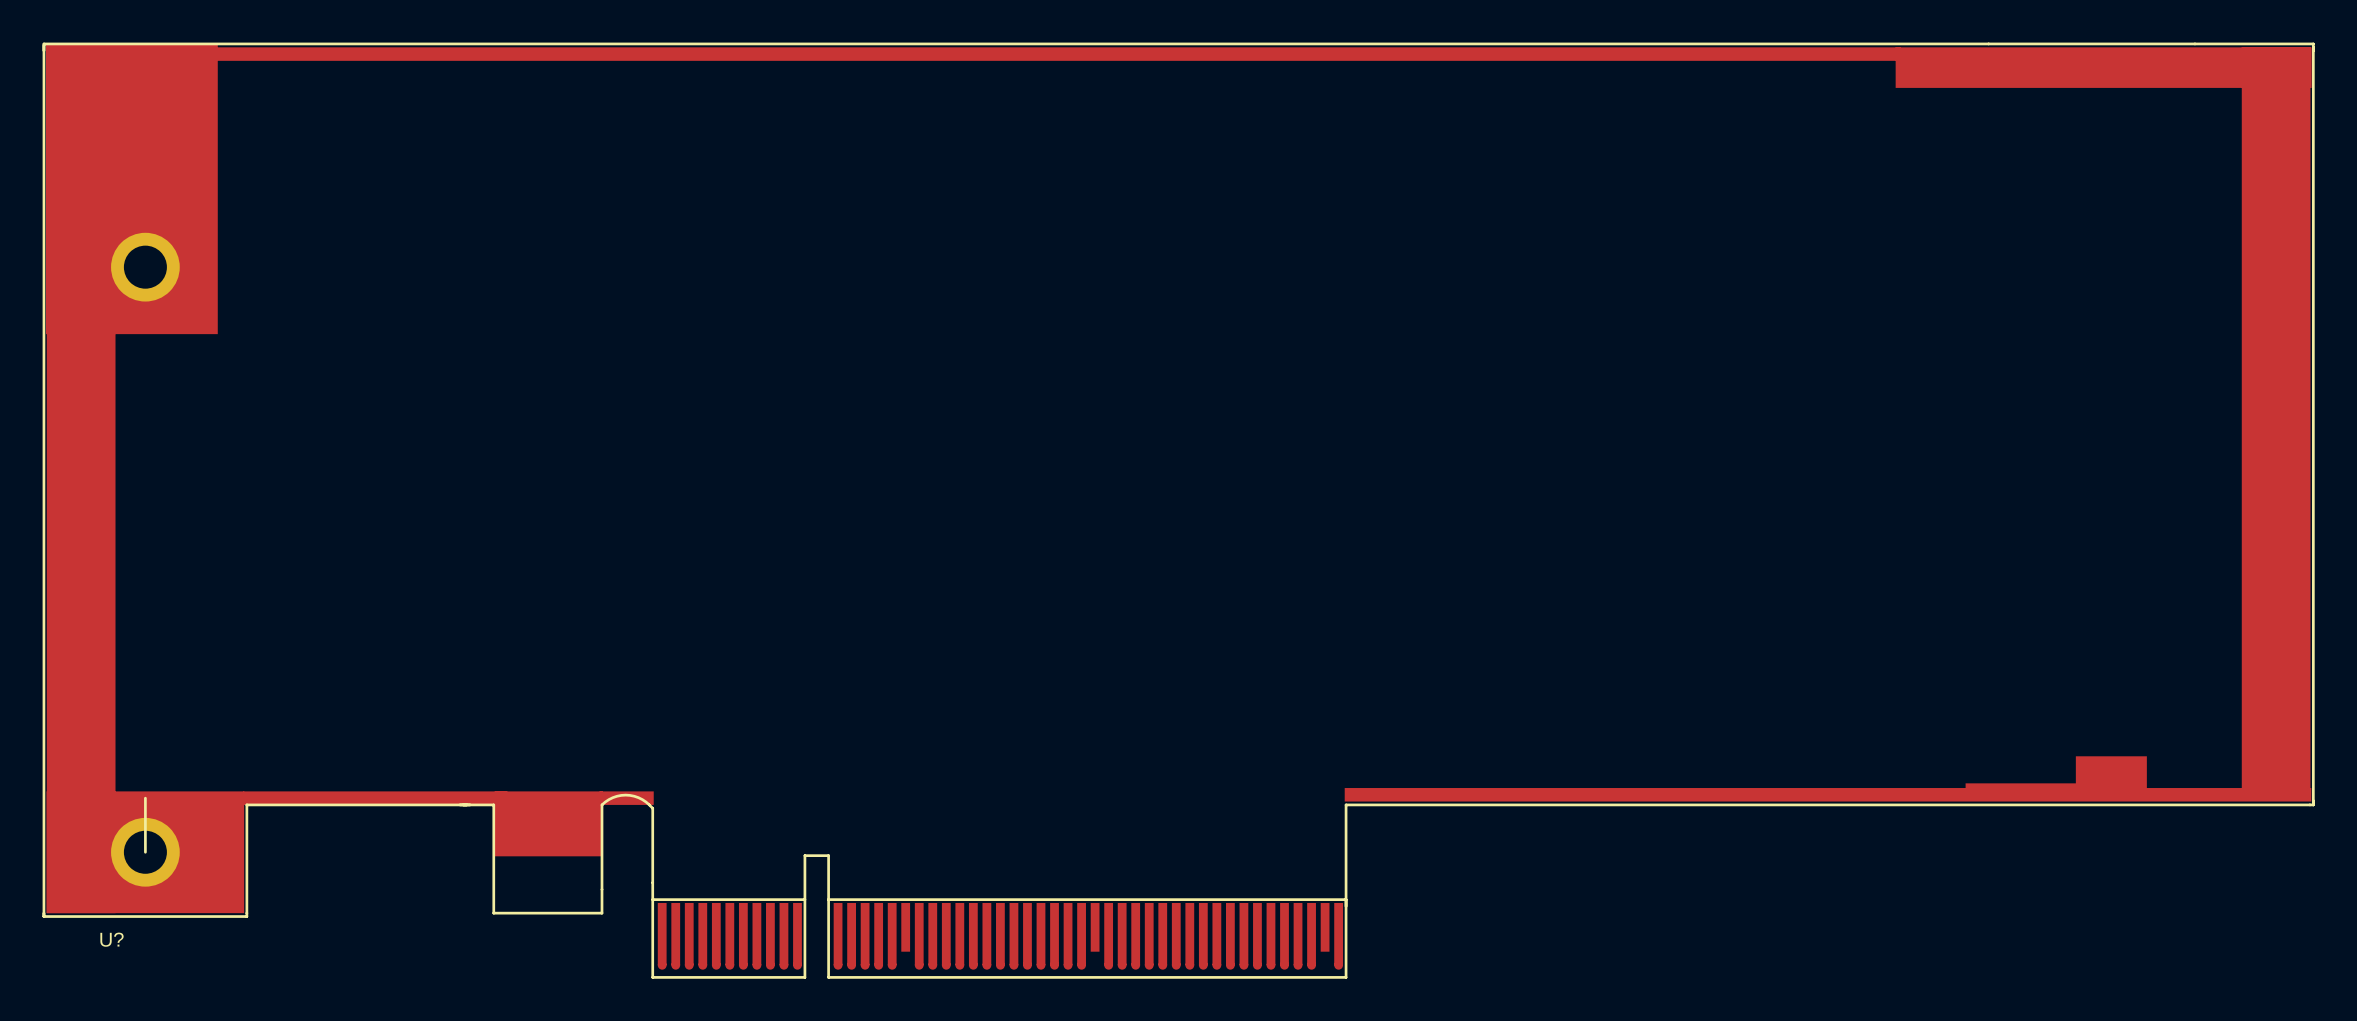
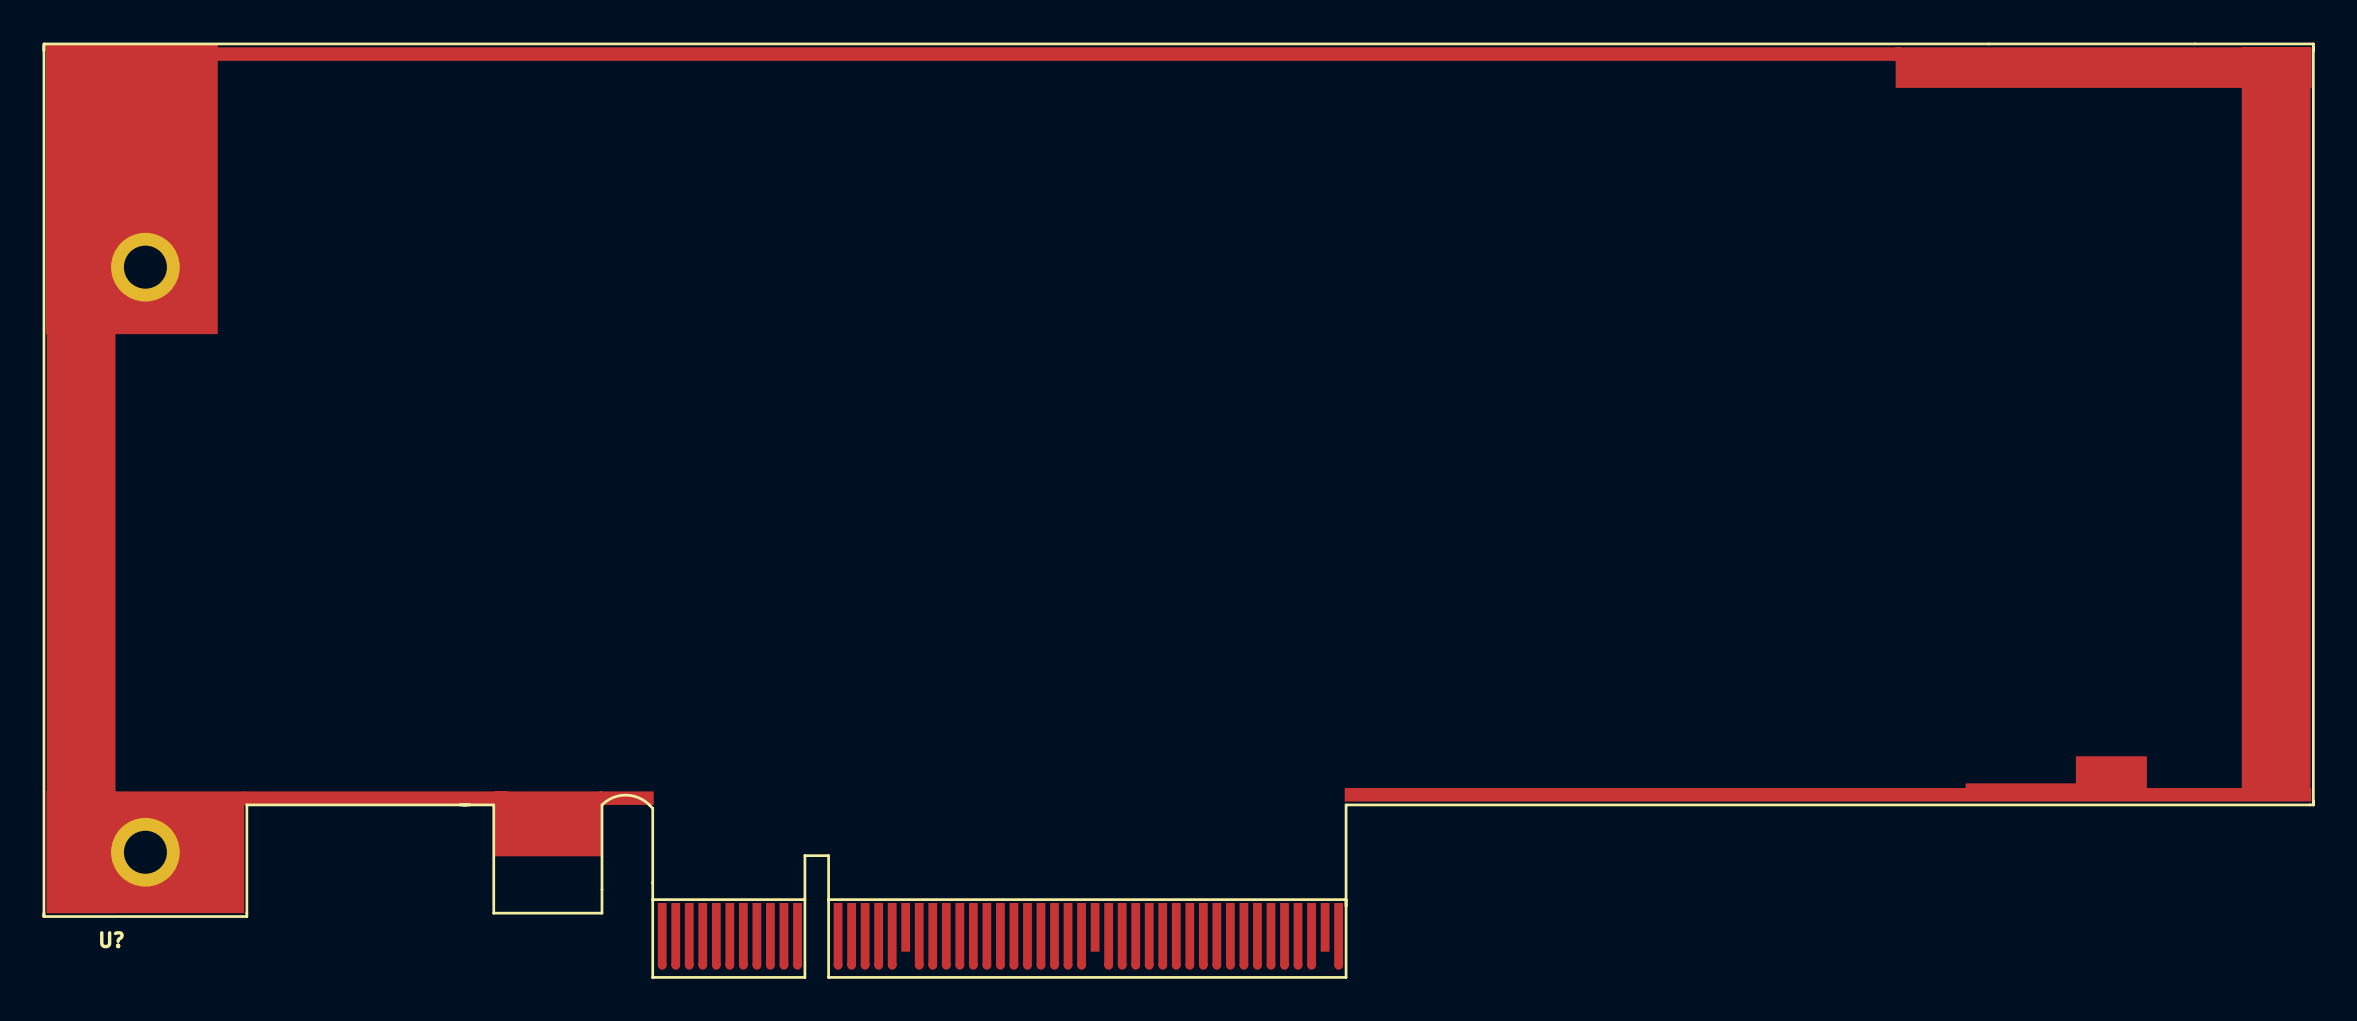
U? footprint: [42, 42, 2315, 979] -> [42, 42, 2315, 979]

